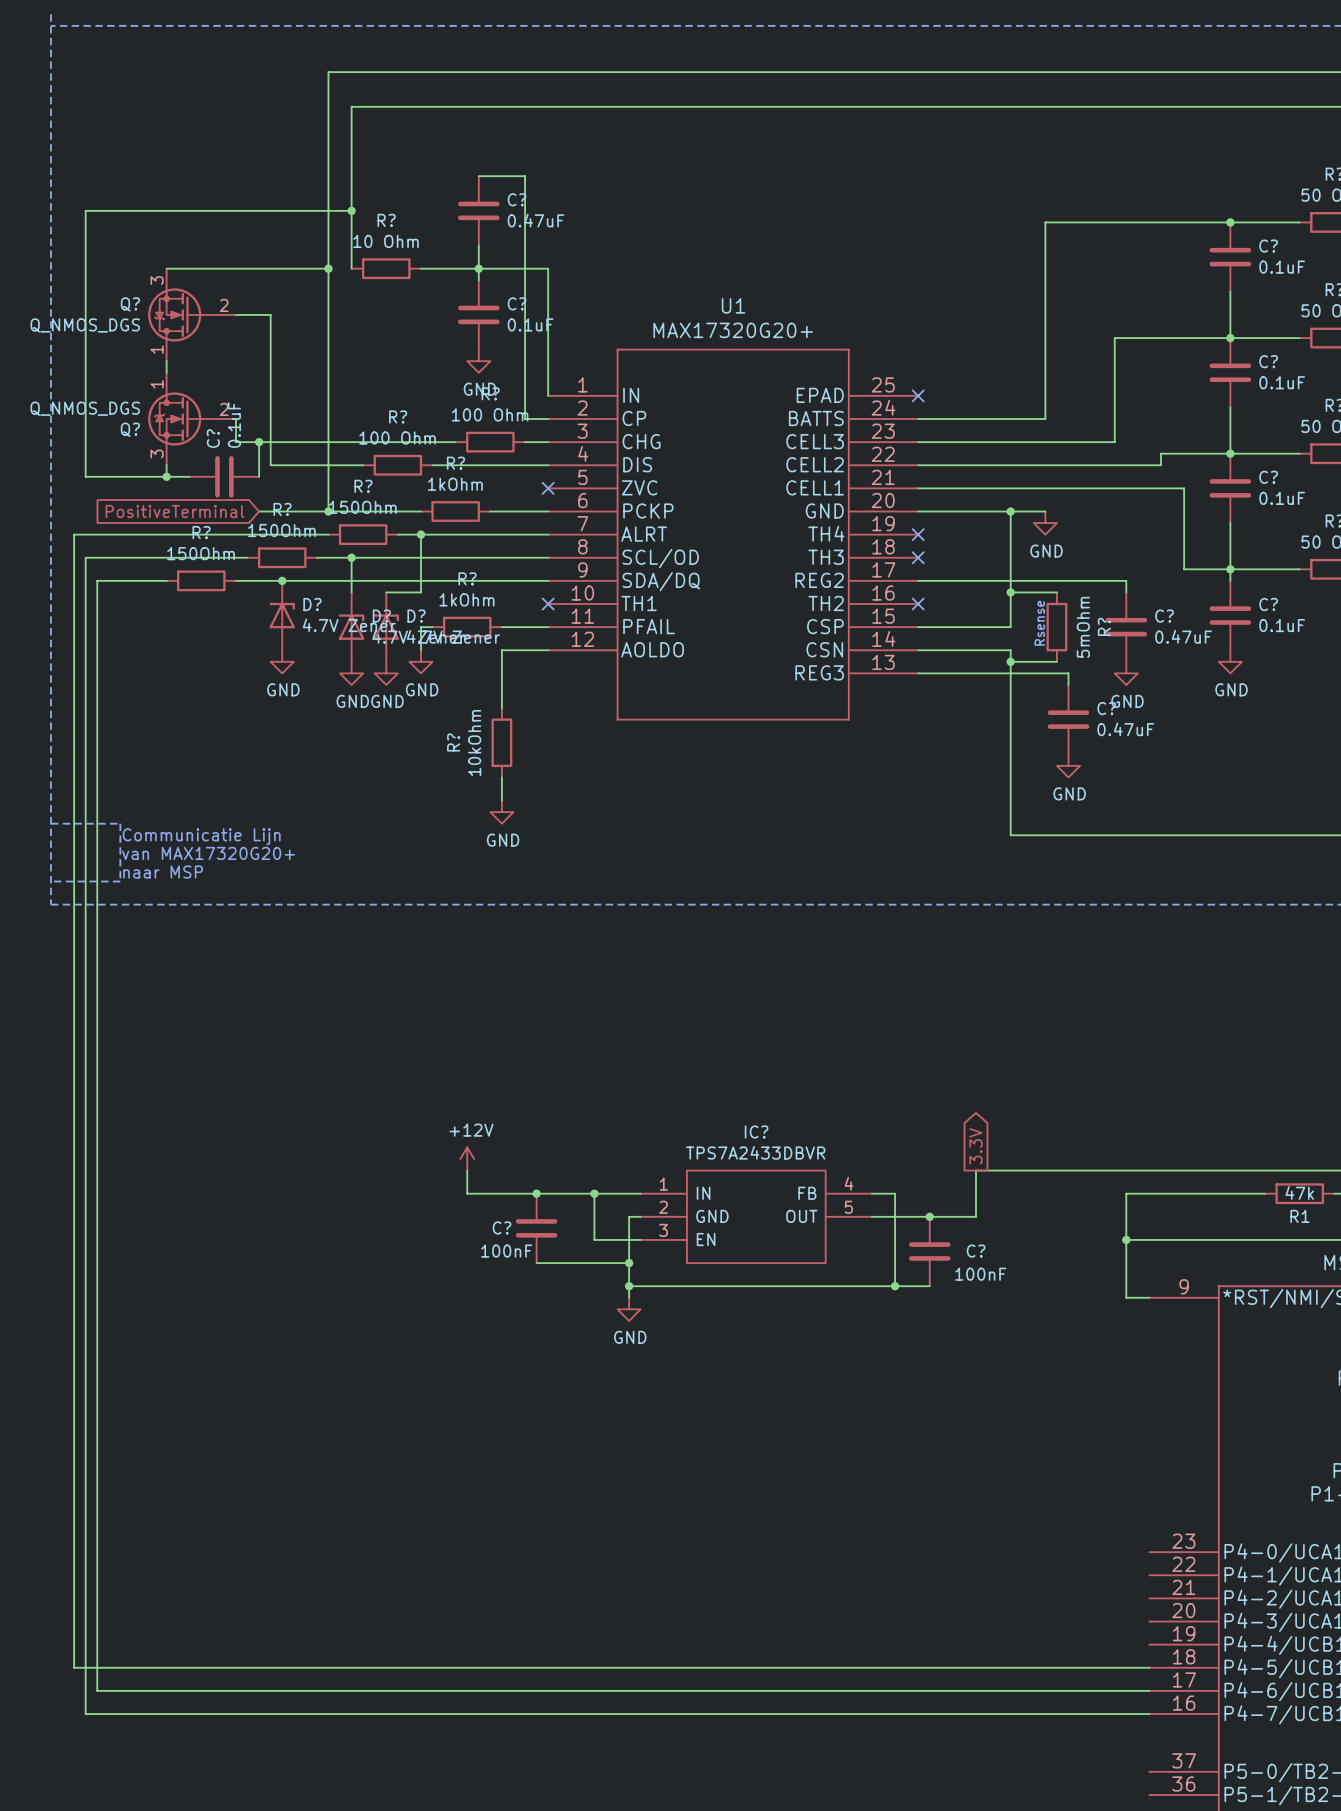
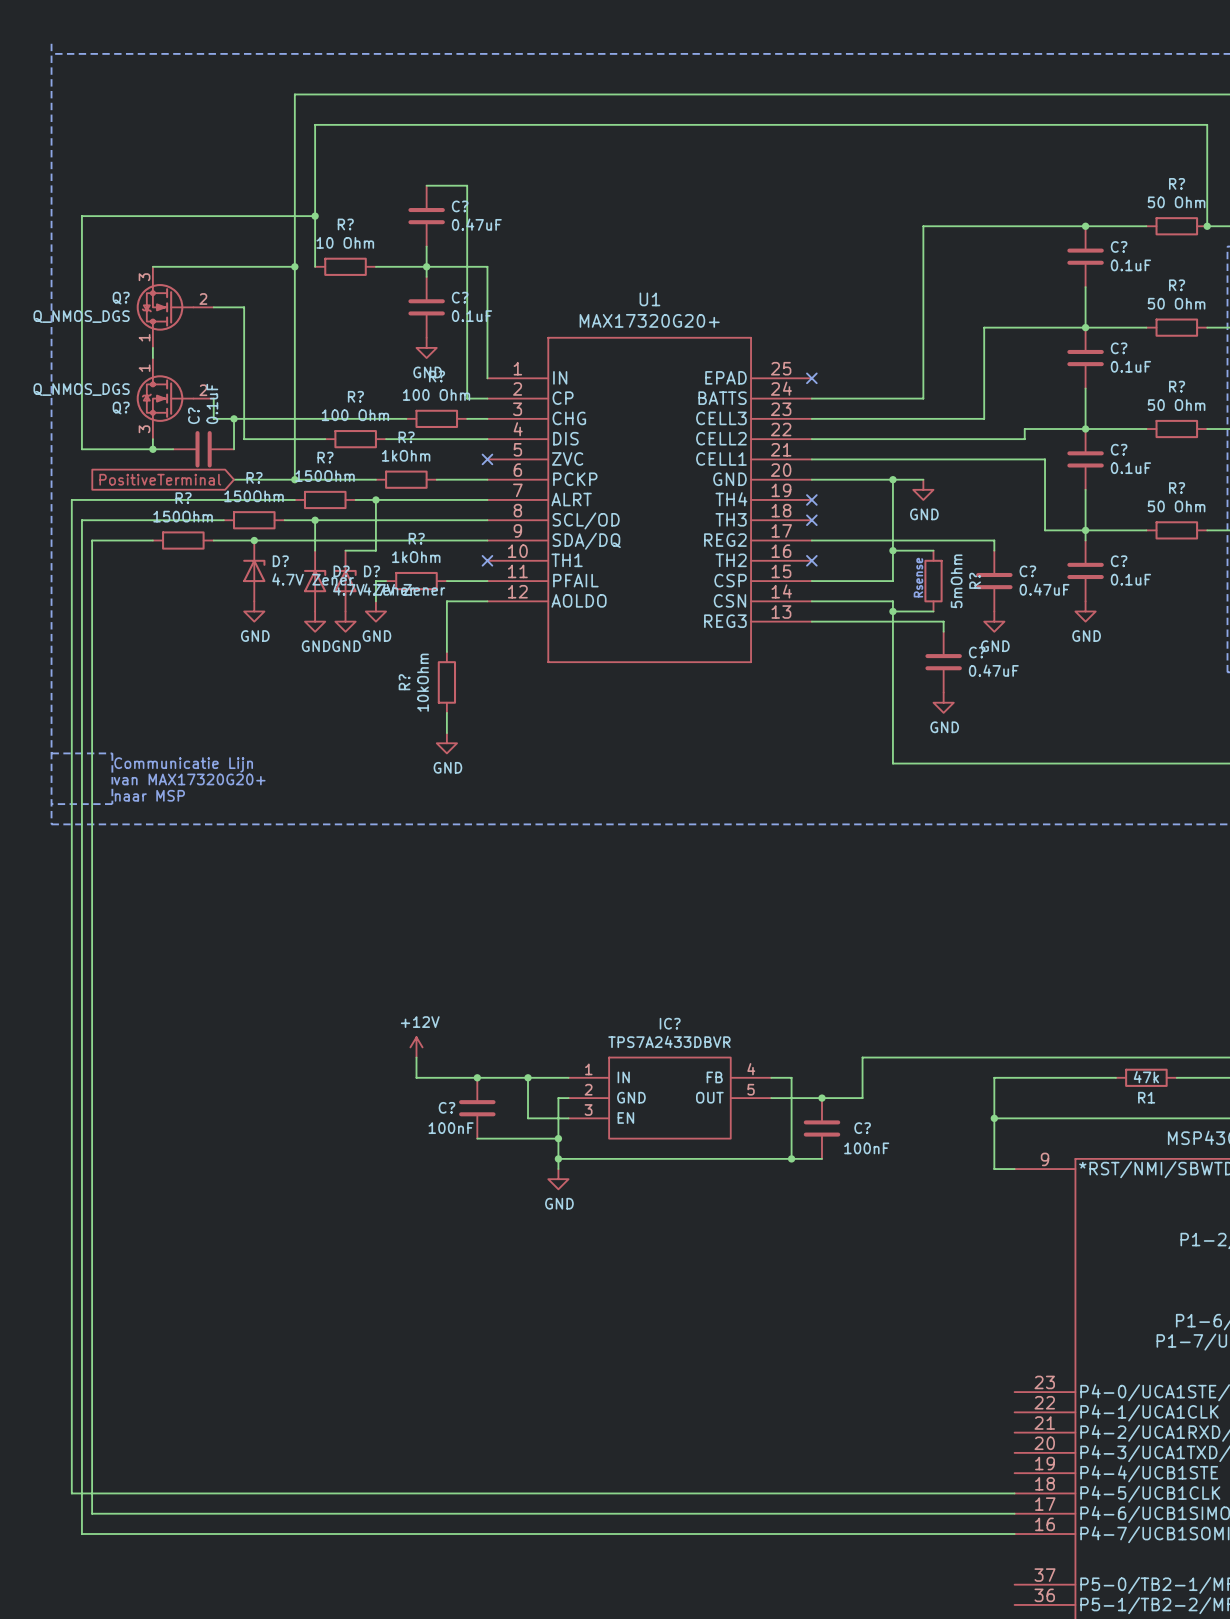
global label: 3.3V (976, 1146) -> none

